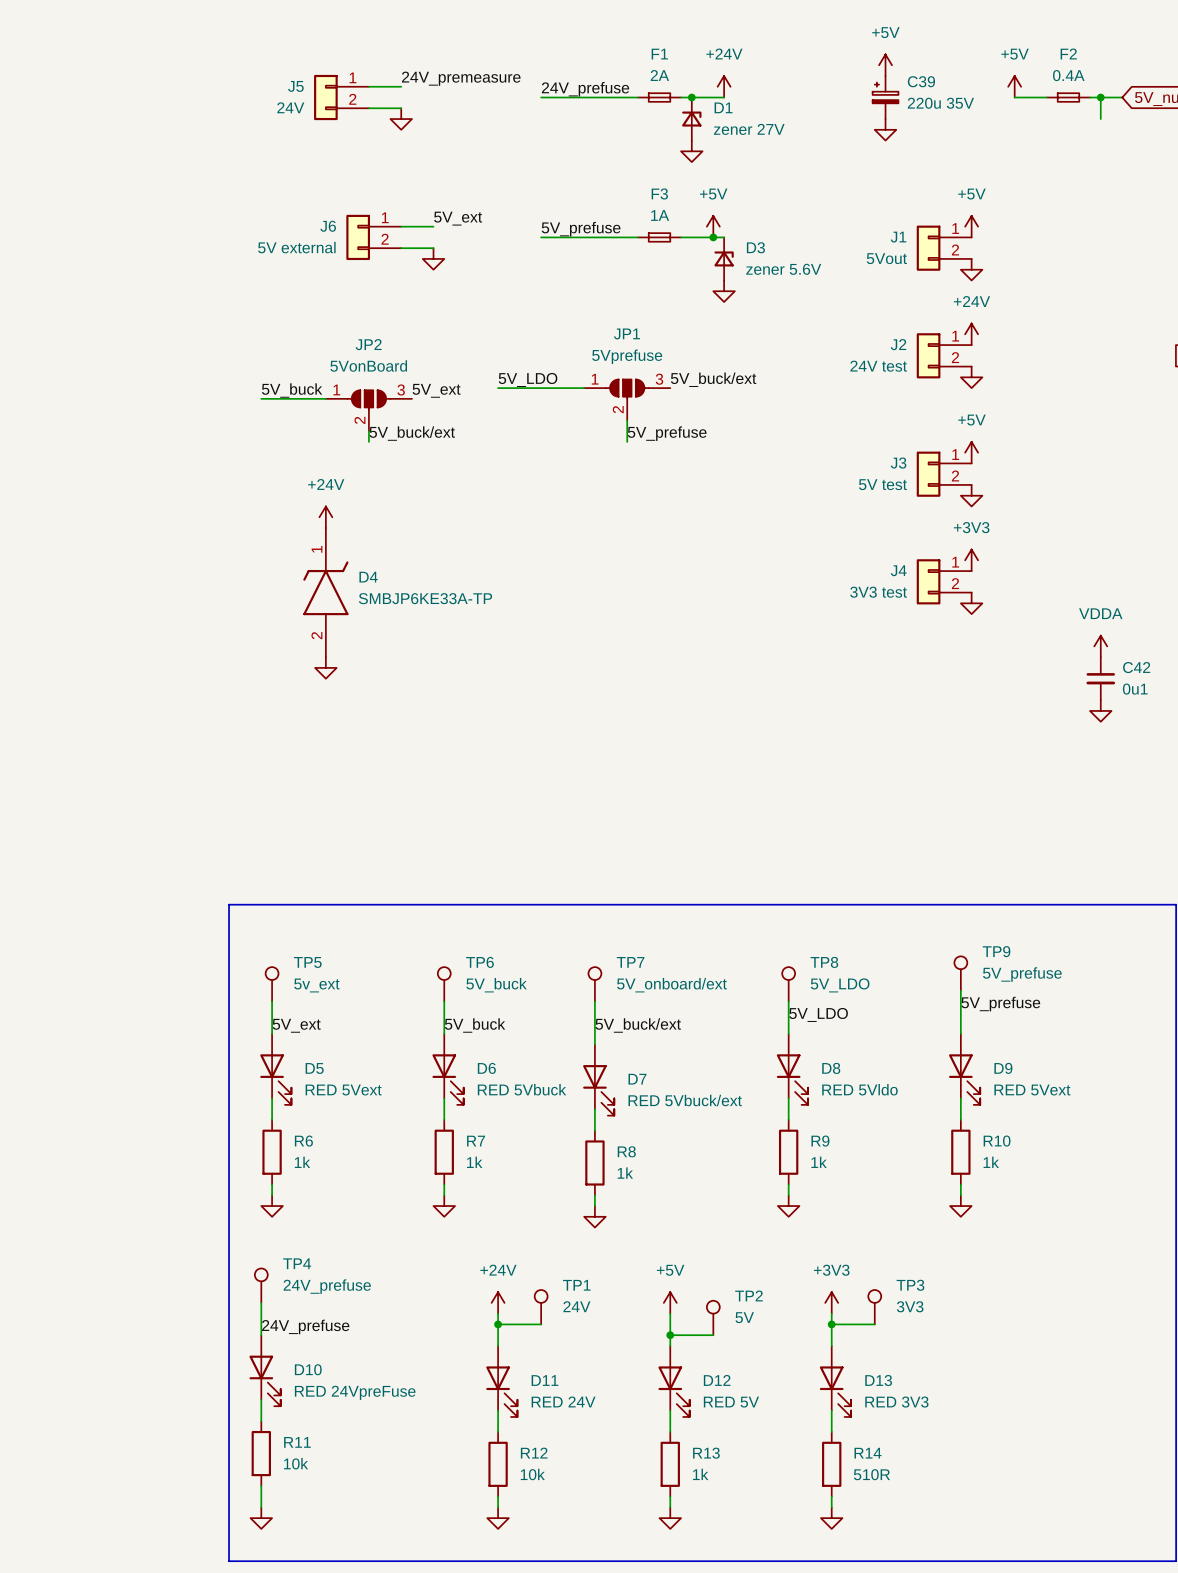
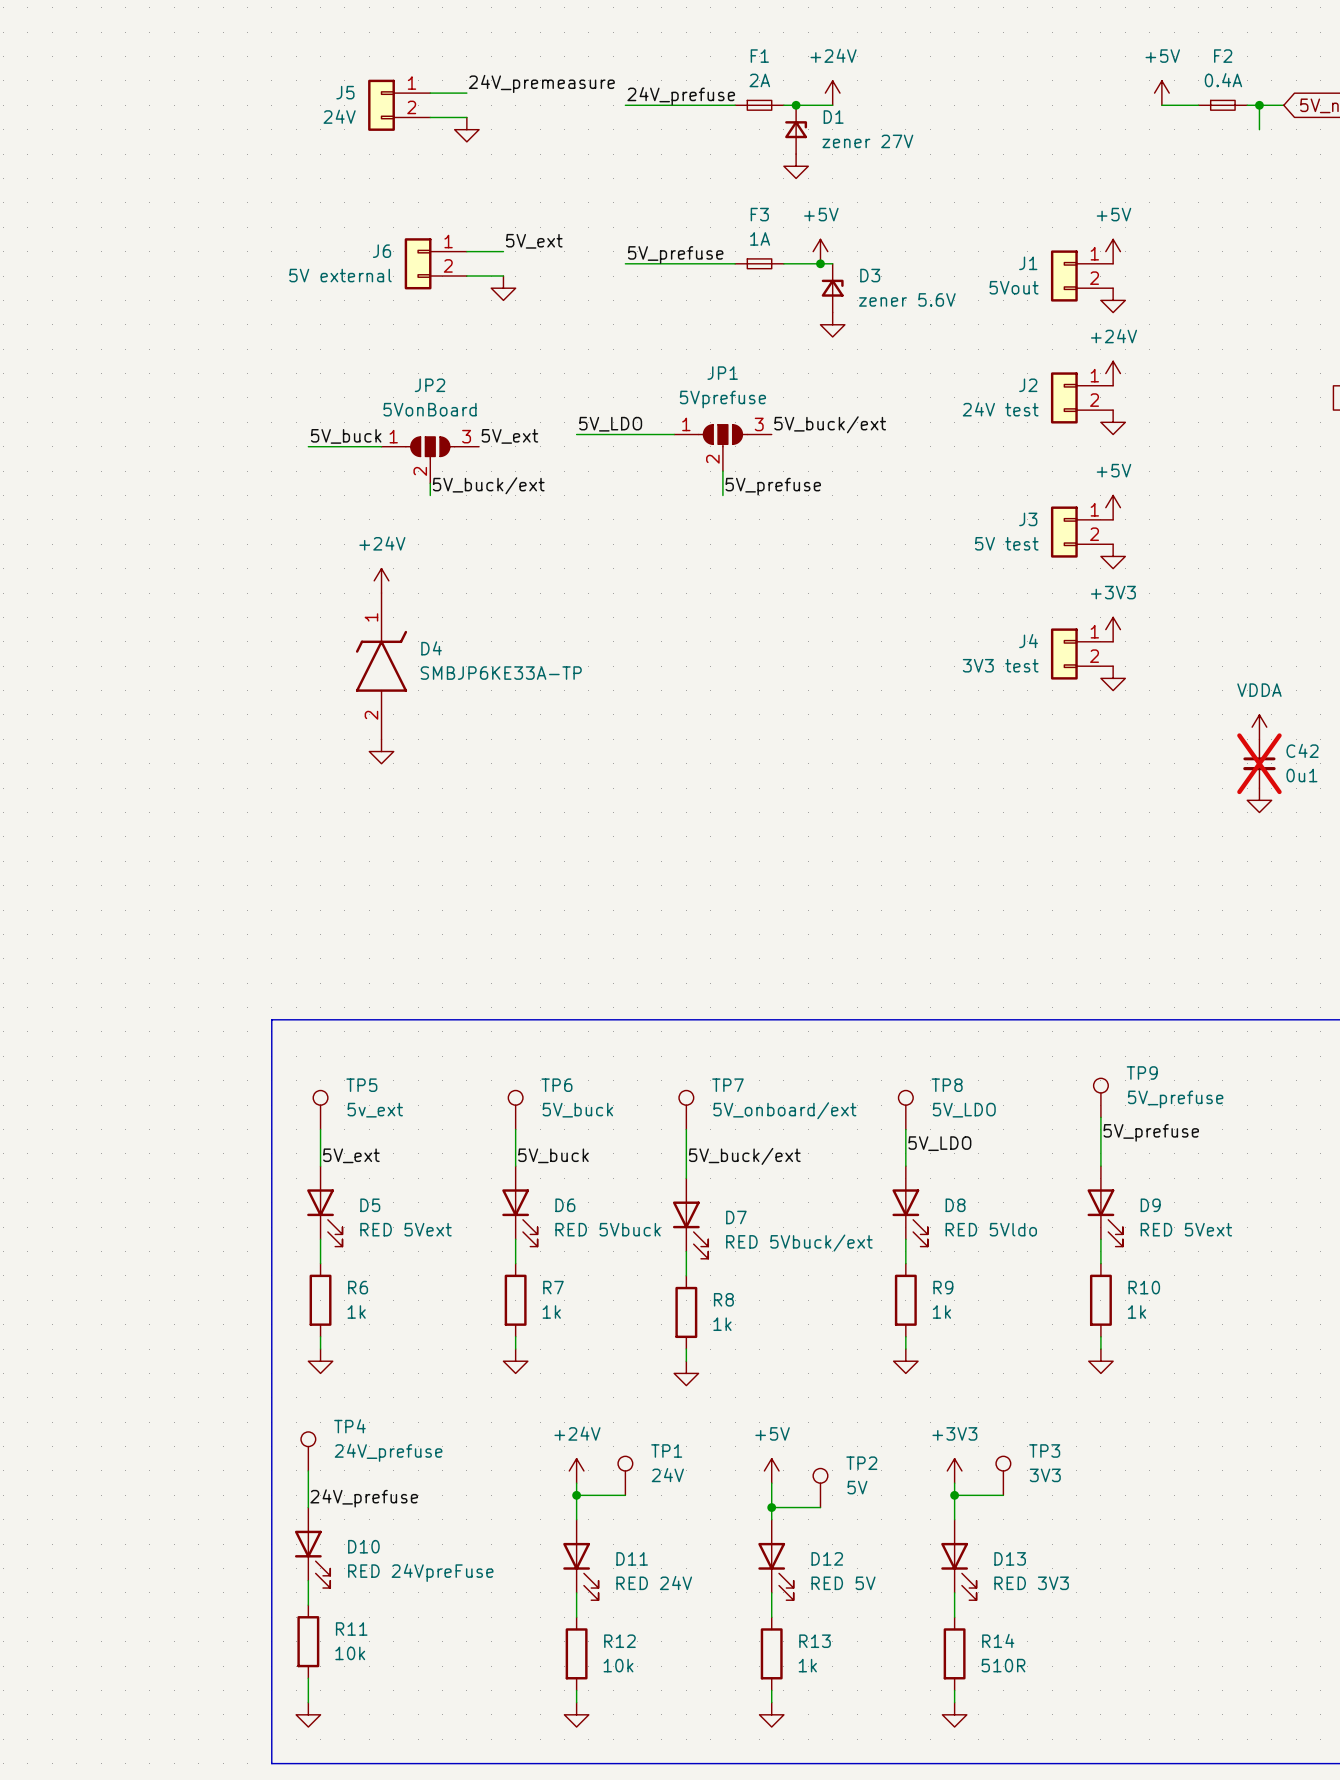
power symbol: +5V (885, 65) -> none
C39: 220u 35V (885, 97) -> none
power symbol: (885, 129) -> none
C42 do-not-place cross: none -> (1259, 763)

